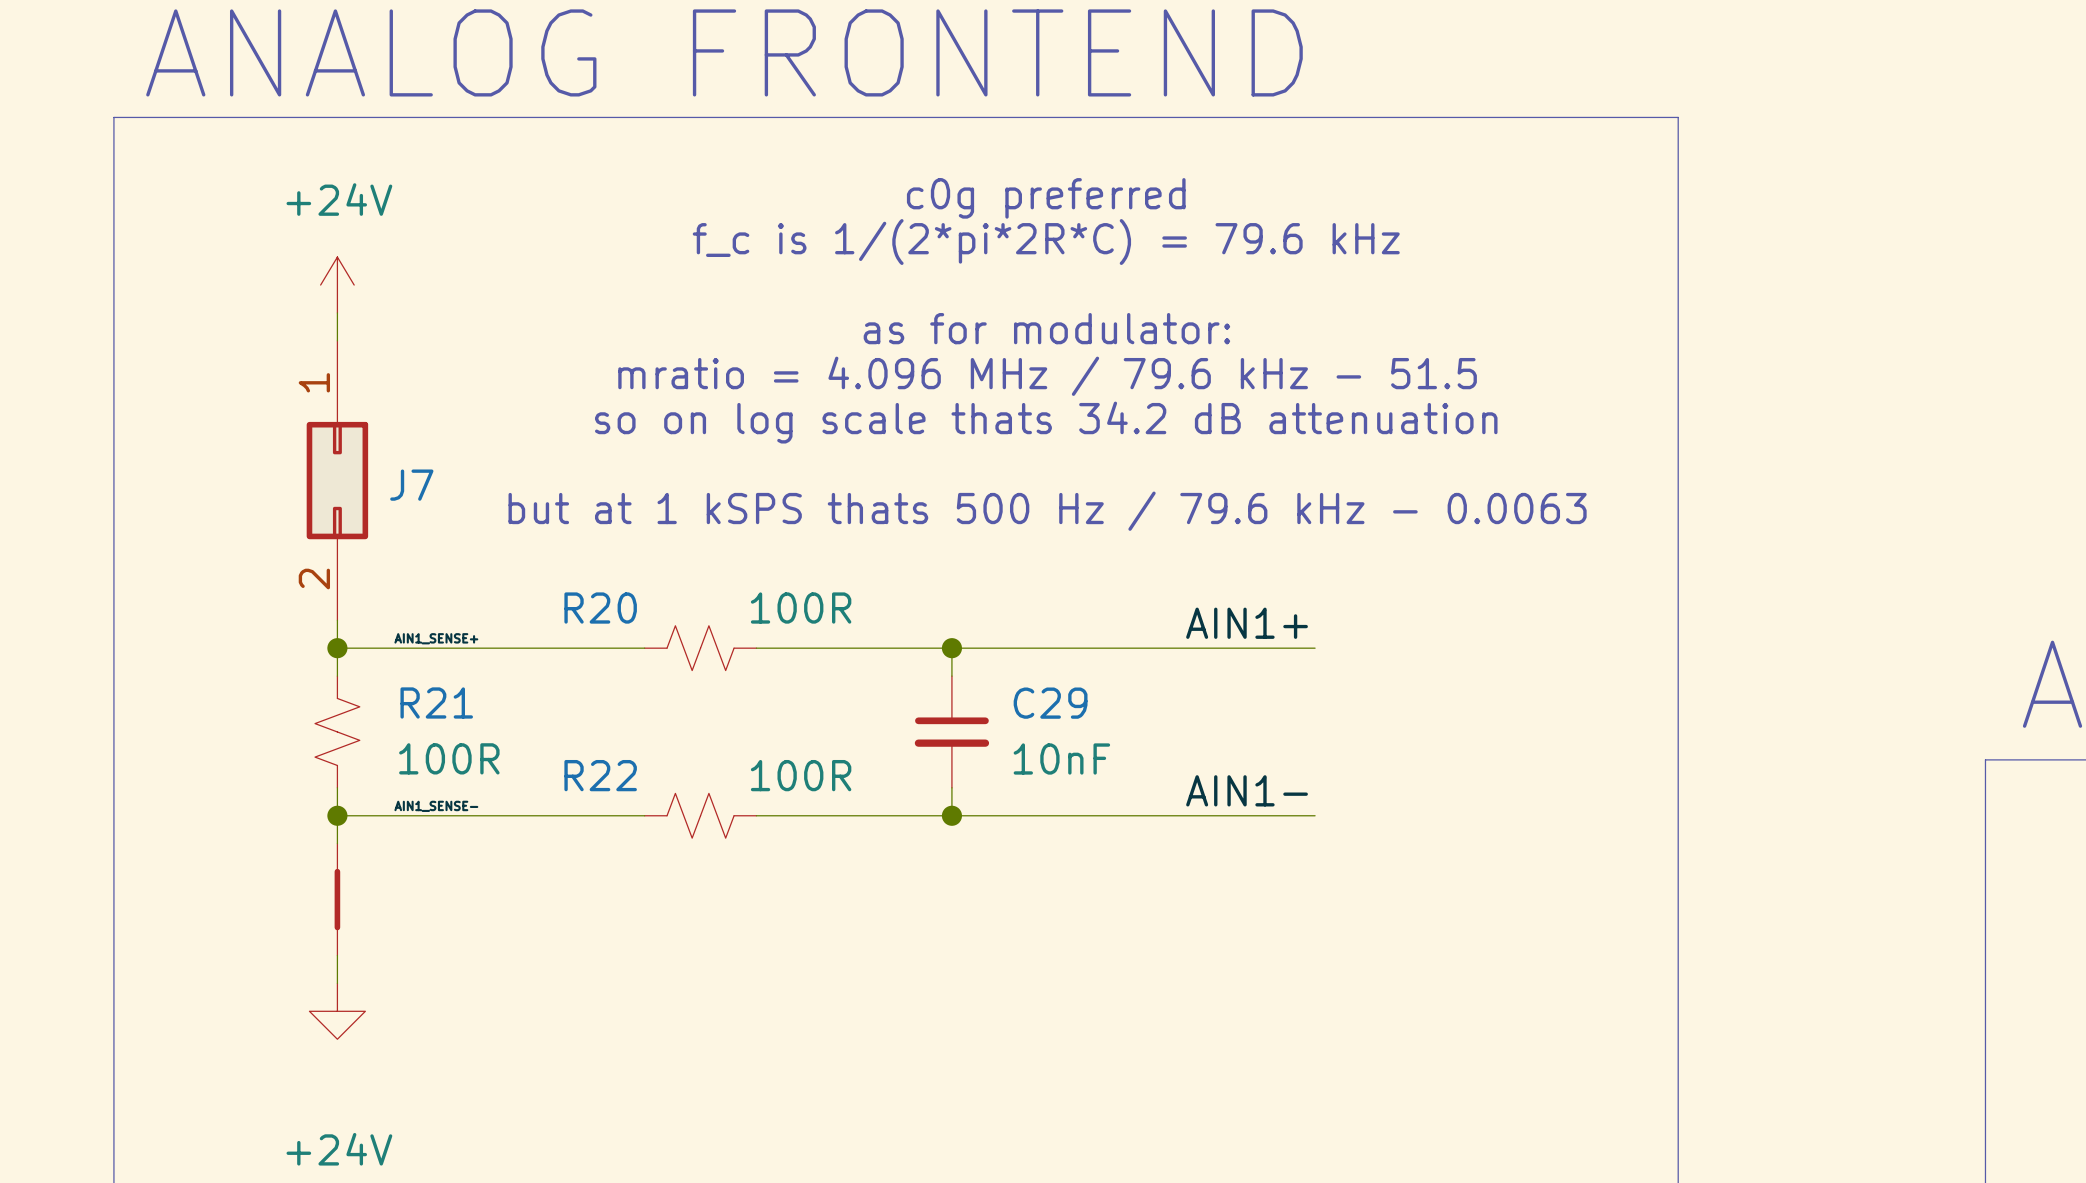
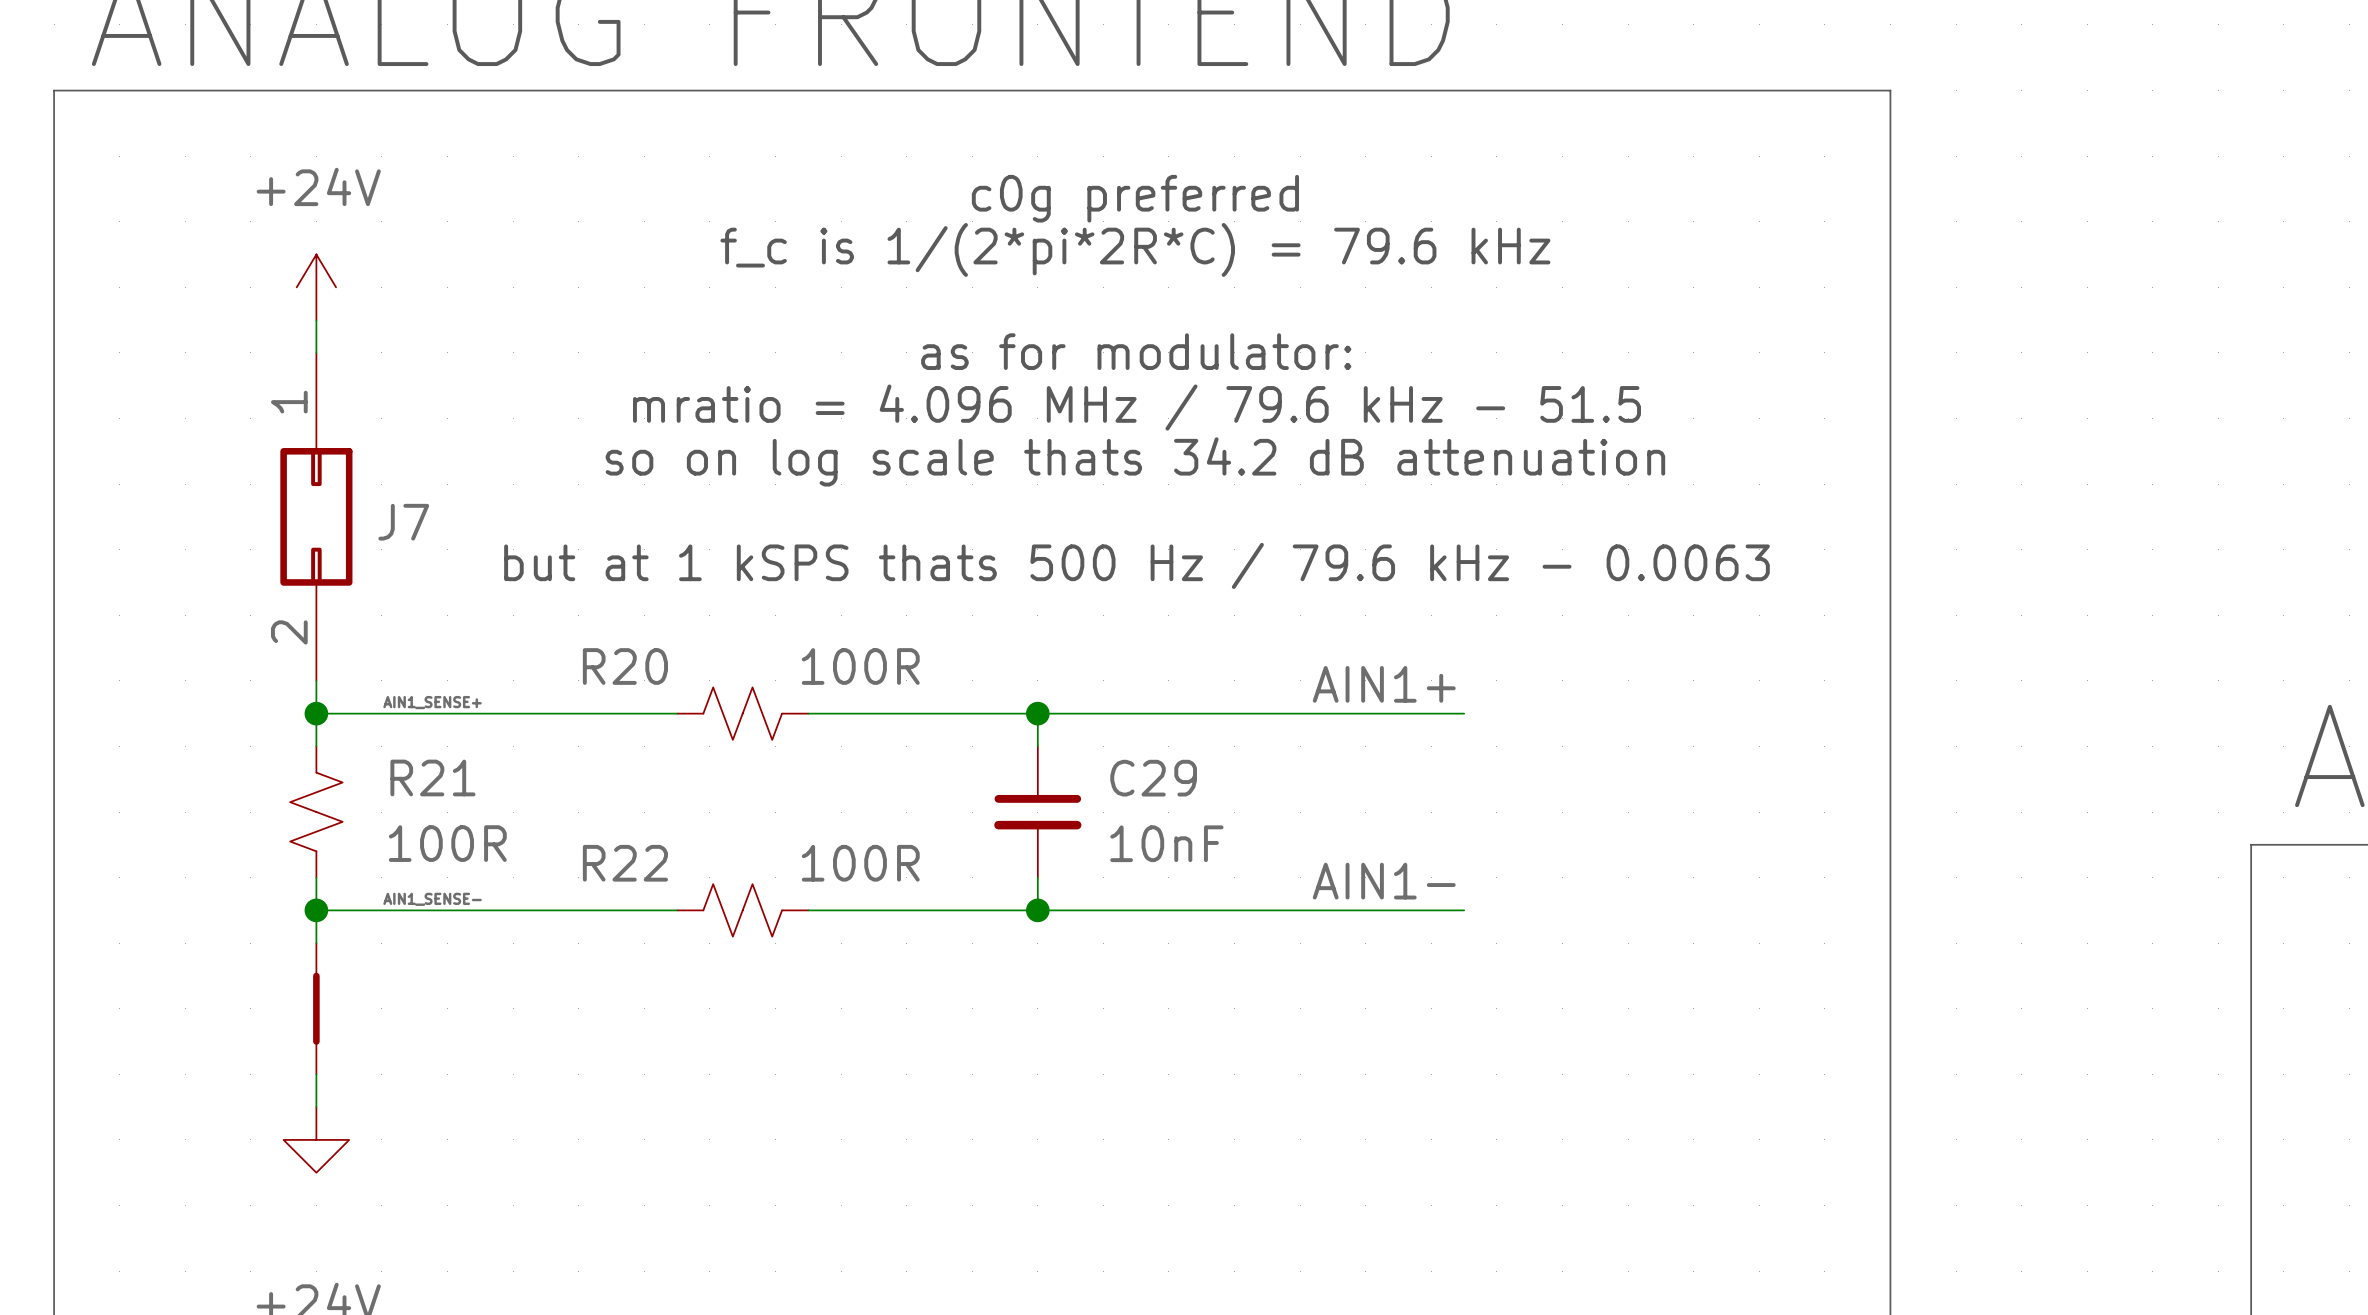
text position: c0g preferred (1046, 198) -> c0g preferred (1135, 198)
text position: f_c is 1/(2*pi*2R*C) = 79.6 kHz (1046, 242) -> f_c is 1/(2*pi*2R*C) = 79.6 kHz (1135, 249)
text position: as for modulator: (1046, 328) -> as for modulator: (1136, 351)
text position: mratio = 4.096 MHz / 79.6 kHz - 51.5 (1047, 376) -> mratio = 4.096 MHz / 79.6 kHz - 51.5 (1136, 407)
text position: so on log scale thats 34.2 dB attenuation (1046, 422) -> so on log scale thats 34.2 dB attenuation (1135, 461)
text position: but at 1 kSPS thats 500 Hz / 79.6 kHz - 0.0063 (1047, 511) -> but at 1 kSPS thats 500 Hz / 79.6 kHz - 0.0063 (1136, 565)

